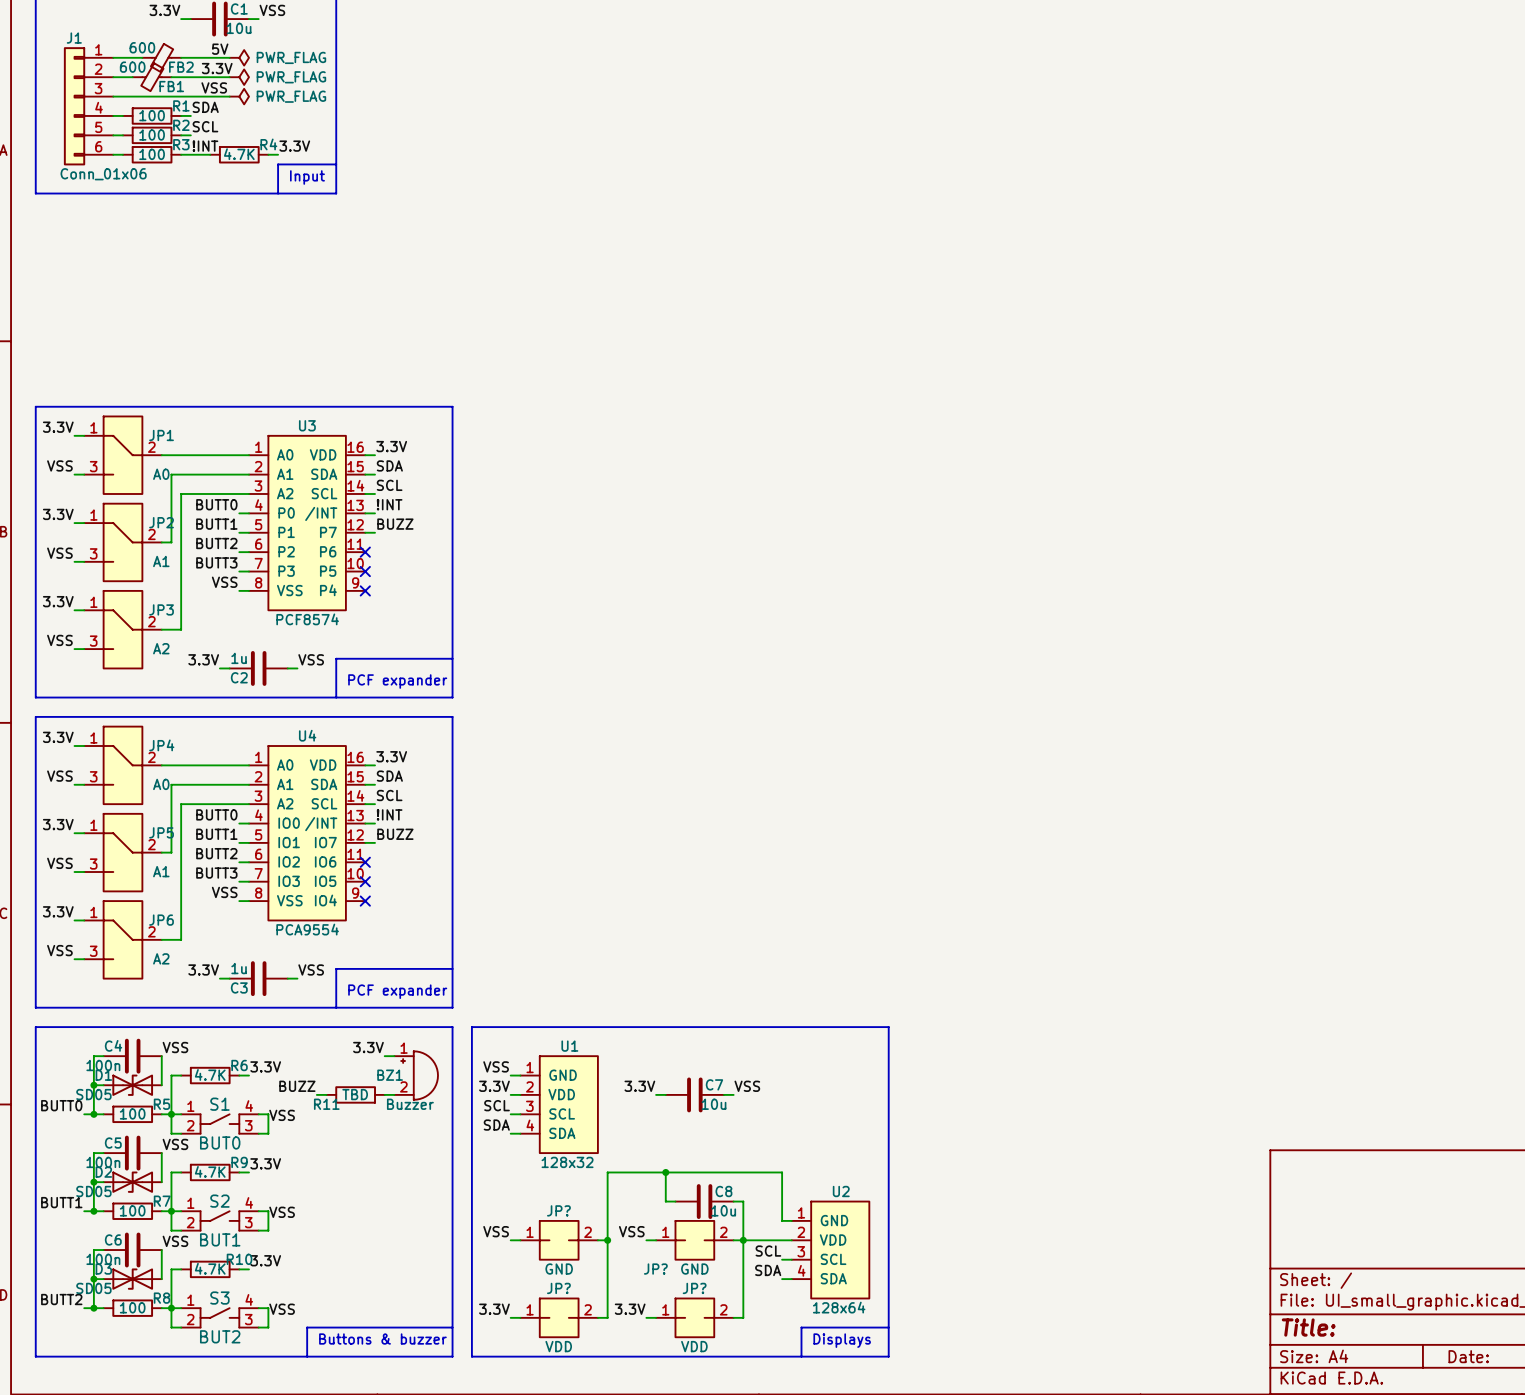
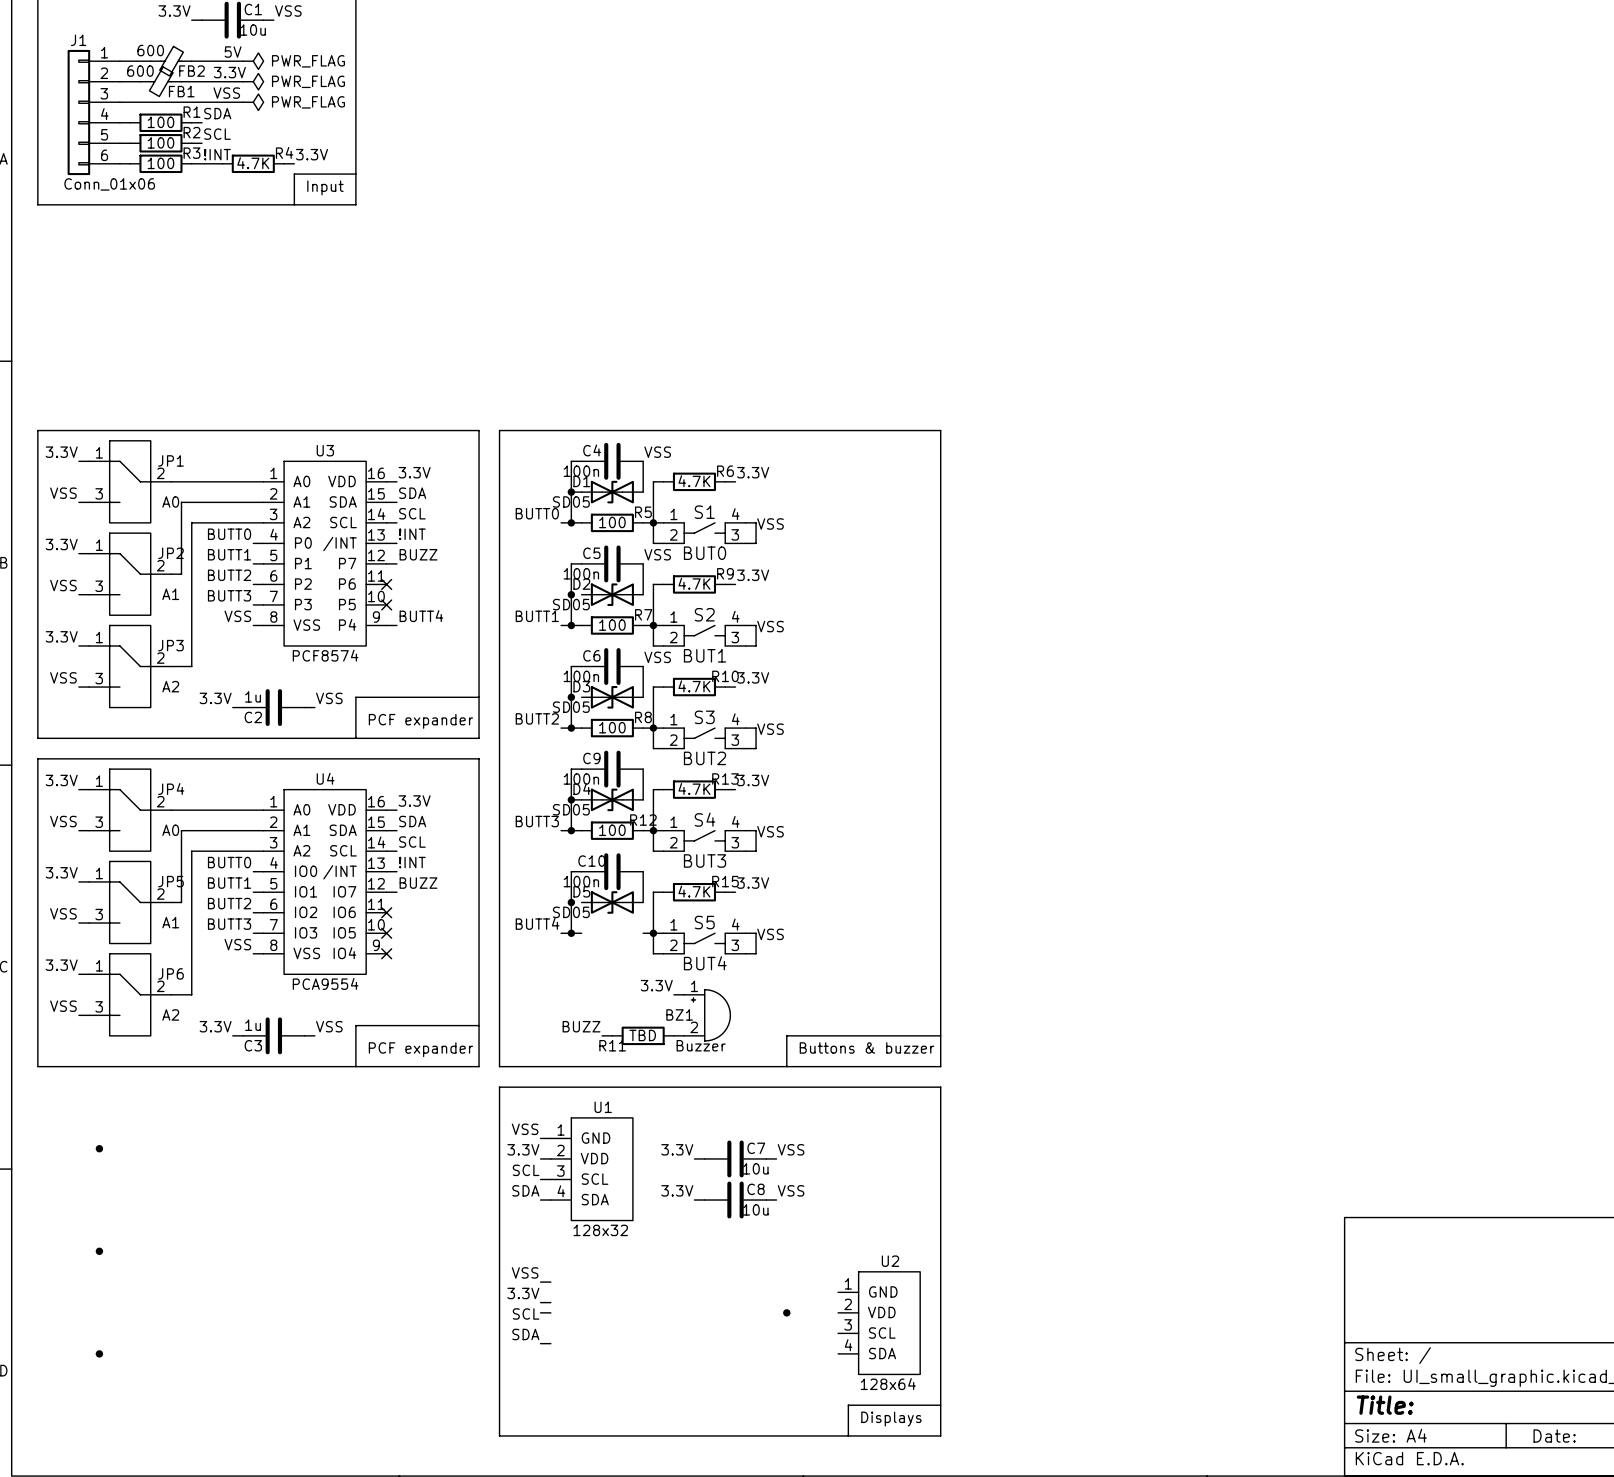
line: none -> (499, 430) (499, 1066) (940, 1066) (940, 430) (499, 430)
label: none -> VSS (657, 452)
wire: none -> (581, 461) (571, 461) (571, 522)
wire: none -> (643, 461) (643, 492)
label: none -> 3.3V (753, 472)
wire: none -> (663, 481) (653, 481) (653, 543) (663, 543)
wire: none -> (725, 481) (735, 481)
wire: none -> (571, 492) (581, 492)
junction: none -> (571, 492)
label: none -> BUTT0 (537, 513)
wire: none -> (561, 522) (581, 522)
junction: none -> (571, 522)
wire: none -> (643, 522) (663, 522)
junction: none -> (653, 522)
wire: none -> (745, 522) (756, 522) (756, 543) (745, 543)
label: none -> VSS (770, 523)
label: none -> VSS (657, 554)
wire: none -> (581, 563) (571, 563) (571, 625)
wire: none -> (643, 563) (643, 594)
label: none -> 3.3V (753, 575)
wire: none -> (663, 584) (653, 584) (653, 646) (663, 646)
wire: none -> (725, 584) (735, 584)
junction: none -> (571, 594)
label: none -> BUTT4 (421, 616)
label: none -> BUTT1 (537, 616)
wire: none -> (386, 625) (396, 625)
no-connect mark: (365, 590) -> none
wire: none -> (561, 625) (581, 625)
junction: none -> (571, 625)
wire: none -> (643, 625) (663, 625)
junction: none -> (653, 625)
wire: none -> (745, 625) (756, 625) (756, 646) (745, 646)
label: none -> VSS (770, 626)
label: none -> VSS (657, 657)
wire: none -> (581, 666) (571, 666) (571, 728)
wire: none -> (643, 666) (643, 697)
label: none -> 3.3V (753, 677)
wire: none -> (663, 687) (653, 687) (653, 748) (663, 748)
wire: none -> (725, 687) (735, 687)
junction: none -> (571, 697)
label: none -> BUTT2 (537, 718)
wire: none -> (561, 728) (581, 728)
junction: none -> (571, 728)
wire: none -> (643, 728) (663, 728)
junction: none -> (653, 728)
wire: none -> (745, 728) (756, 728) (756, 748) (745, 748)
label: none -> VSS (770, 729)
wire: none -> (581, 769) (571, 769) (571, 830)
C9: none -> 100n (612, 769)
wire: none -> (643, 769) (643, 799)
label: none -> 3.3V (753, 780)
wire: none -> (663, 789) (653, 789) (653, 851) (663, 851)
R13: none -> 4.7K (694, 789)
wire: none -> (725, 789) (735, 789)
wire: none -> (571, 799) (581, 799)
junction: none -> (571, 799)
D4: none -> SD05 (612, 799)
label: none -> BUTT3 (537, 821)
wire: none -> (561, 830) (581, 830)
junction: none -> (571, 830)
R12: none -> 100 (612, 830)
wire: none -> (643, 830) (663, 830)
junction: none -> (653, 830)
wire: none -> (745, 830) (756, 830) (756, 851) (745, 851)
label: none -> VSS (770, 831)
S4: none -> BUT3 (704, 840)
wire: none -> (581, 871) (571, 871) (571, 933)
C10: none -> 100n (612, 871)
wire: none -> (643, 871) (643, 902)
label: none -> 3.3V (753, 883)
wire: none -> (663, 892) (653, 892) (653, 953) (663, 953)
R15: none -> 4.7K (694, 892)
wire: none -> (725, 892) (735, 892)
junction: none -> (571, 902)
D5: none -> SD05 (612, 902)
label: none -> BUTT4 (537, 923)
wire: none -> (561, 933) (581, 933)
junction: none -> (571, 933)
wire: none -> (643, 933) (663, 933)
junction: none -> (653, 933)
wire: none -> (745, 933) (756, 933) (756, 953) (745, 953)
label: none -> VSS (770, 934)
S5: none -> BUT4 (704, 943)
label: none -> 3.3V (656, 985)
wire: none -> (673, 994) (684, 994)
label: none -> BUZZ (581, 1026)
wire: none -> (602, 1035) (612, 1035)
wire: none -> (673, 1035) (684, 1035)
line: none -> (940, 1035) (786, 1035) (786, 1066)
text: none -> Buttons & buzzer (867, 1047)
line: (35, 1027) (35, 1356) (452, 1356) (452, 1027) (35, 1027) -> none
label: VSS (175, 1047) -> none
label: 3.3V (368, 1047) -> none
wire: (103, 1056) (93, 1056) (93, 1114) -> none
C4 position: (132, 1056) -> (612, 461)
wire: (161, 1056) (161, 1085) -> none
wire: (384, 1056) (394, 1056) -> none
label: 3.3V (265, 1066) -> none
wire: (181, 1075) (171, 1075) (171, 1133) (181, 1133) -> none
R6 position: (210, 1075) -> (694, 481)
wire: (239, 1075) (249, 1075) -> none
BZ1 position: (416, 1075) -> (707, 1015)
wire: (93, 1085) (103, 1085) -> none
D1 position: (132, 1085) -> (612, 492)
label: BUZZ (297, 1086) -> none
wire: (316, 1094) (326, 1094) -> none
R11 position: (355, 1094) -> (643, 1035)
wire: (384, 1094) (394, 1094) -> (540, 1282) (550, 1282)
label: BUTT0 (61, 1105) -> none
wire: (84, 1114) (103, 1114) -> none
junction: (93, 1114) -> none
R5 position: (132, 1114) -> (612, 522)
wire: (161, 1114) (181, 1114) -> none
junction: (171, 1114) -> none
wire: (258, 1114) (268, 1114) (268, 1133) (258, 1133) -> none
label: VSS (282, 1115) -> none
S1 position: (219, 1124) -> (704, 533)
label: none -> 3.3V (677, 1190)
label: none -> VSS (791, 1190)
label: VSS (175, 1144) -> none
wire: (103, 1153) (93, 1153) (93, 1211) -> none
C5 position: (132, 1153) -> (612, 563)
wire: (161, 1153) (161, 1182) -> none
label: 3.3V (265, 1163) -> none
wire: (181, 1172) (171, 1172) (171, 1230) (181, 1230) -> none
R9 position: (210, 1172) -> (694, 584)
wire: (239, 1172) (249, 1172) -> none
wire: (665, 1172) (665, 1201) (675, 1201) -> none
junction: (665, 1172) -> none
wire: (93, 1182) (103, 1182) -> none
D2 position: (132, 1182) -> (612, 594)
C8 position: (704, 1201) -> (735, 1200)
wire: (733, 1201) (743, 1201) (743, 1317) (733, 1317) -> none
label: BUTT1 (61, 1202) -> none
wire: (84, 1211) (103, 1211) -> none
junction: (93, 1211) -> none
R7 position: (132, 1211) -> (612, 625)
wire: (161, 1211) (181, 1211) -> none
junction: (171, 1211) -> none
wire: (258, 1211) (268, 1211) (268, 1230) (258, 1230) -> none
label: VSS (282, 1212) -> none
S2 position: (219, 1220) -> (704, 635)
wire: (791, 1220) (782, 1220) (782, 1172) (607, 1172) (607, 1317) (597, 1317) -> none
label: none -> 3.3V (523, 1293)
label position: VSS (496, 1231) -> VSS (525, 1272)
label: VSS (631, 1231) -> none
JP?: GND (559, 1240) -> none
wire: (597, 1240) (607, 1240) -> (540, 1302) (550, 1302)
junction: (607, 1240) -> none
wire: (646, 1240) (656, 1240) -> (694, 1200) (704, 1200)
JP?: GND (694, 1240) -> none
wire: (733, 1240) (791, 1240) -> none
label: VSS (175, 1241) -> none
label: none -> SCL (526, 1313)
wire: (103, 1250) (93, 1250) (93, 1308) -> none
C6 position: (132, 1250) -> (612, 666)
wire: (161, 1250) (161, 1279) -> none
label: SCL (768, 1251) -> none
wire: (782, 1259) (791, 1259) -> (766, 1200) (776, 1200)
label: 3.3V (265, 1260) -> none
label: none -> SDA (525, 1334)
wire: (181, 1269) (171, 1269) (171, 1327) (181, 1327) -> none
R10 position: (210, 1269) -> (694, 687)
wire: (239, 1269) (249, 1269) -> none
label: SDA (768, 1270) -> none
wire: (93, 1279) (103, 1279) -> none
D3 position: (132, 1279) -> (612, 697)
wire: (782, 1279) (791, 1279) -> none
label: BUTT2 (61, 1299) -> none
wire: (84, 1308) (103, 1308) -> none
junction: (93, 1308) -> none
R8 position: (132, 1308) -> (612, 728)
wire: (161, 1308) (181, 1308) -> none
junction: (171, 1308) -> none
wire: (258, 1308) (268, 1308) (268, 1327) (258, 1327) -> none
label: VSS (282, 1309) -> none
label: 3.3V (494, 1309) -> none
label: 3.3V (630, 1309) -> none
S3 position: (219, 1317) -> (704, 738)
wire: (510, 1317) (520, 1317) -> (540, 1343) (550, 1343)
JP?: VDD (559, 1317) -> none
wire: (646, 1317) (656, 1317) -> none
JP?: VDD (694, 1317) -> none
line: (452, 1327) (307, 1327) (307, 1356) -> none
text: Buttons & buzzer (382, 1339) -> none

